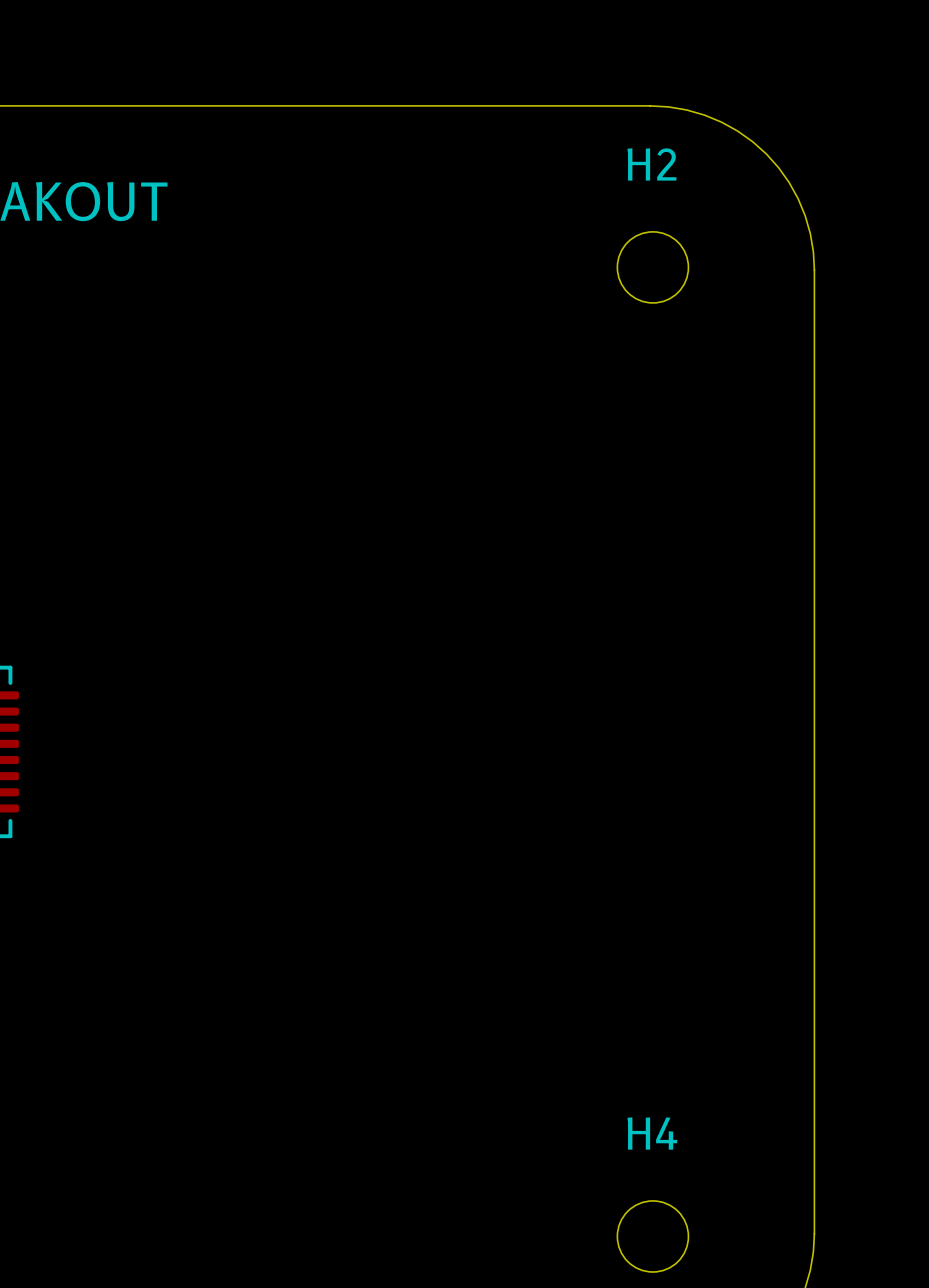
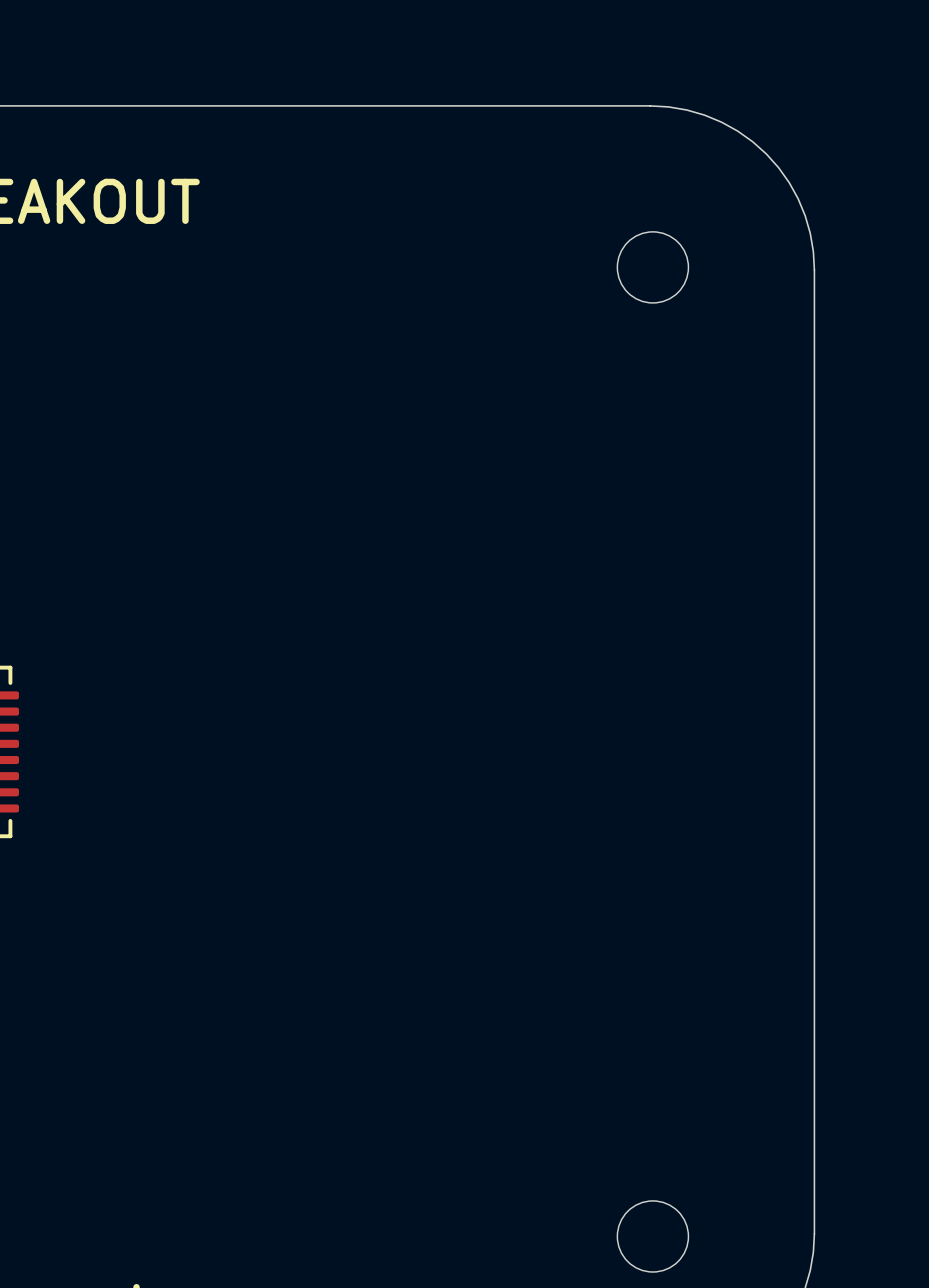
H2 name: H2 (651, 164) -> none
H4 name: H4 (652, 1133) -> none

